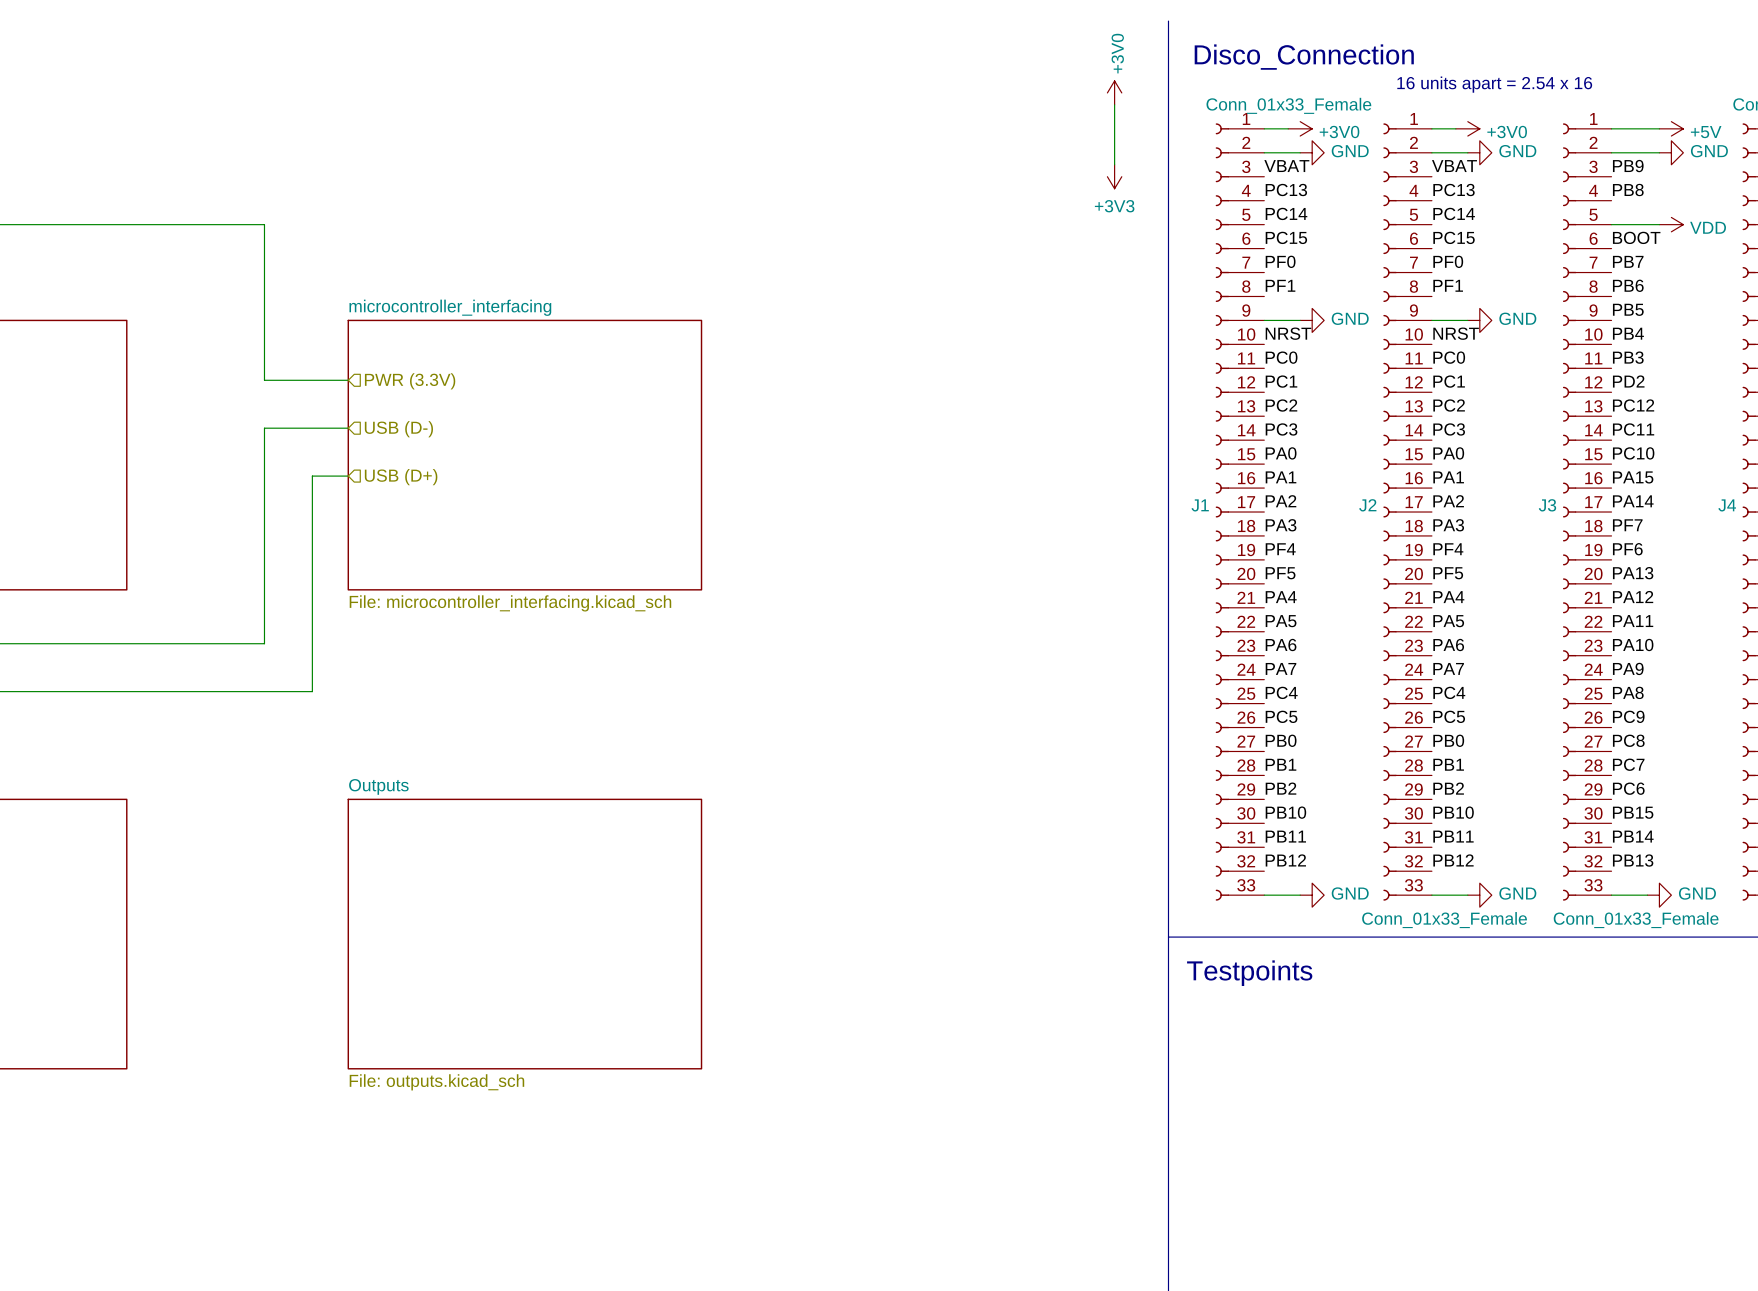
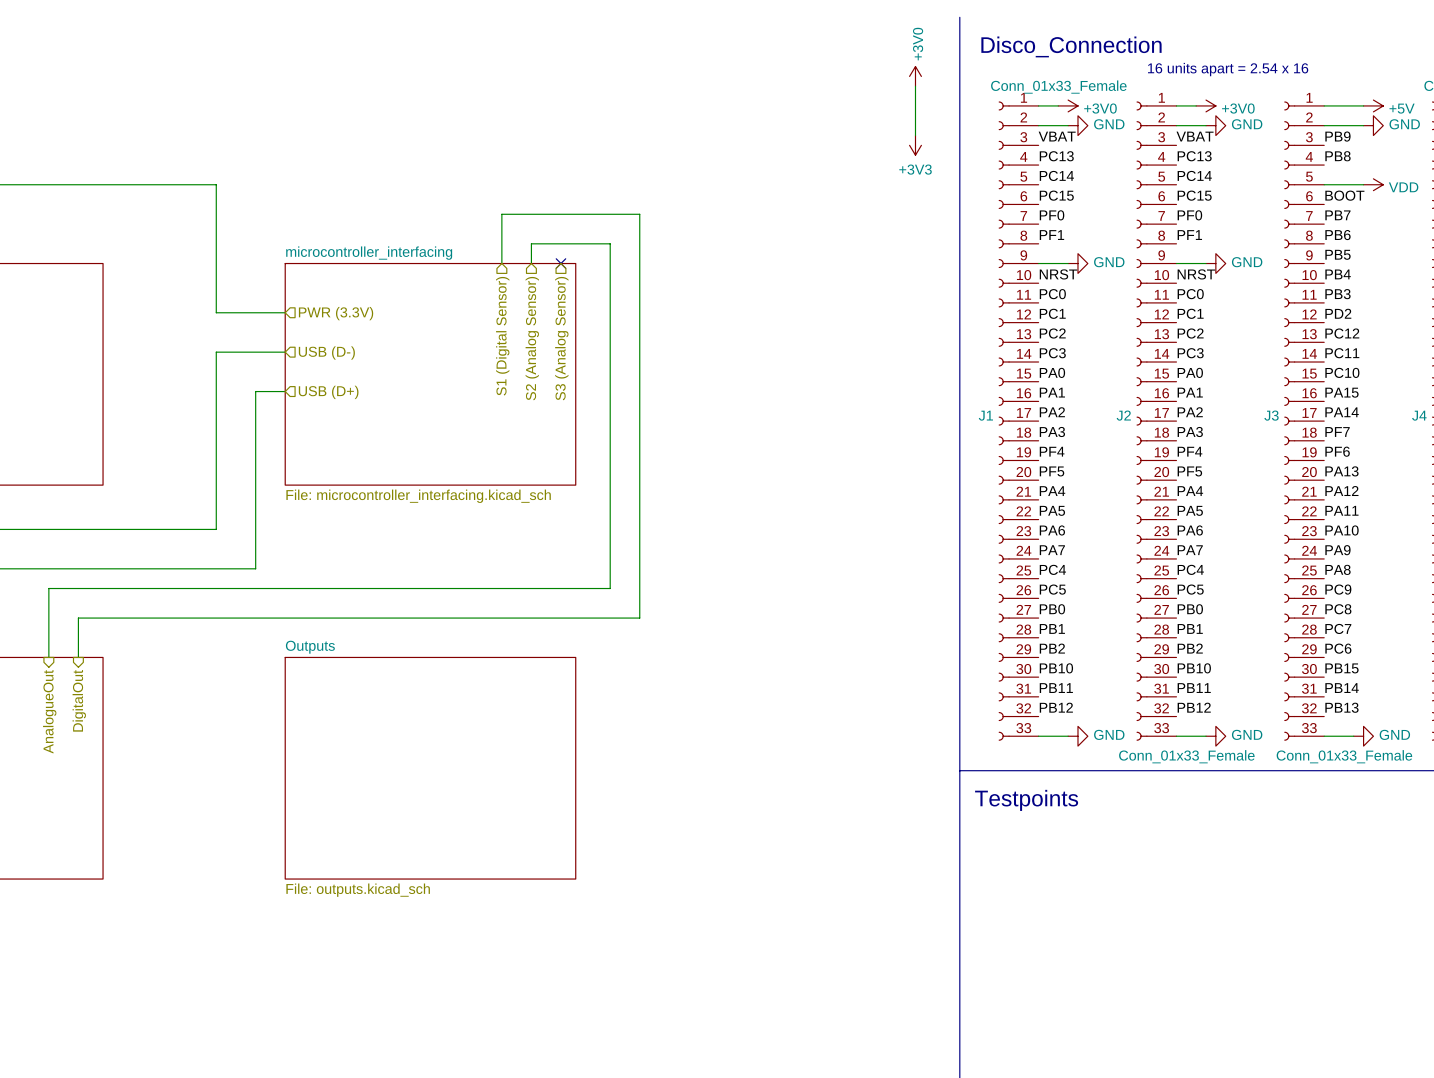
wire: none -> (501, 263) (501, 214) (639, 214) (639, 618) (78, 618) (78, 657)
wire: none -> (531, 263) (531, 243) (610, 243) (610, 588) (48, 588) (48, 657)
no-connect mark: none -> (560, 263)
hierarchical label: none -> S1 (Digital Sensor) (502, 336)
hierarchical label: none -> S2 (Analog Sensor) (532, 338)
hierarchical label: none -> S3 (Analog Sensor) (561, 338)
hierarchical label: none -> DigitalOut (79, 700)
hierarchical label: none -> AnalogueOut (49, 711)

